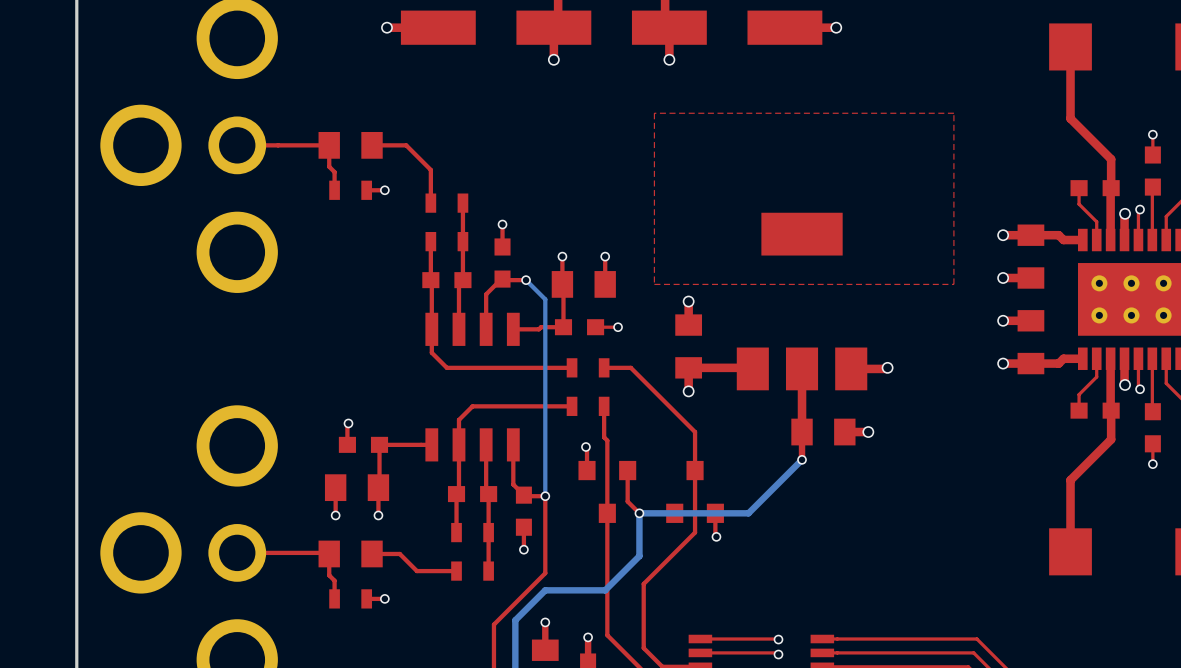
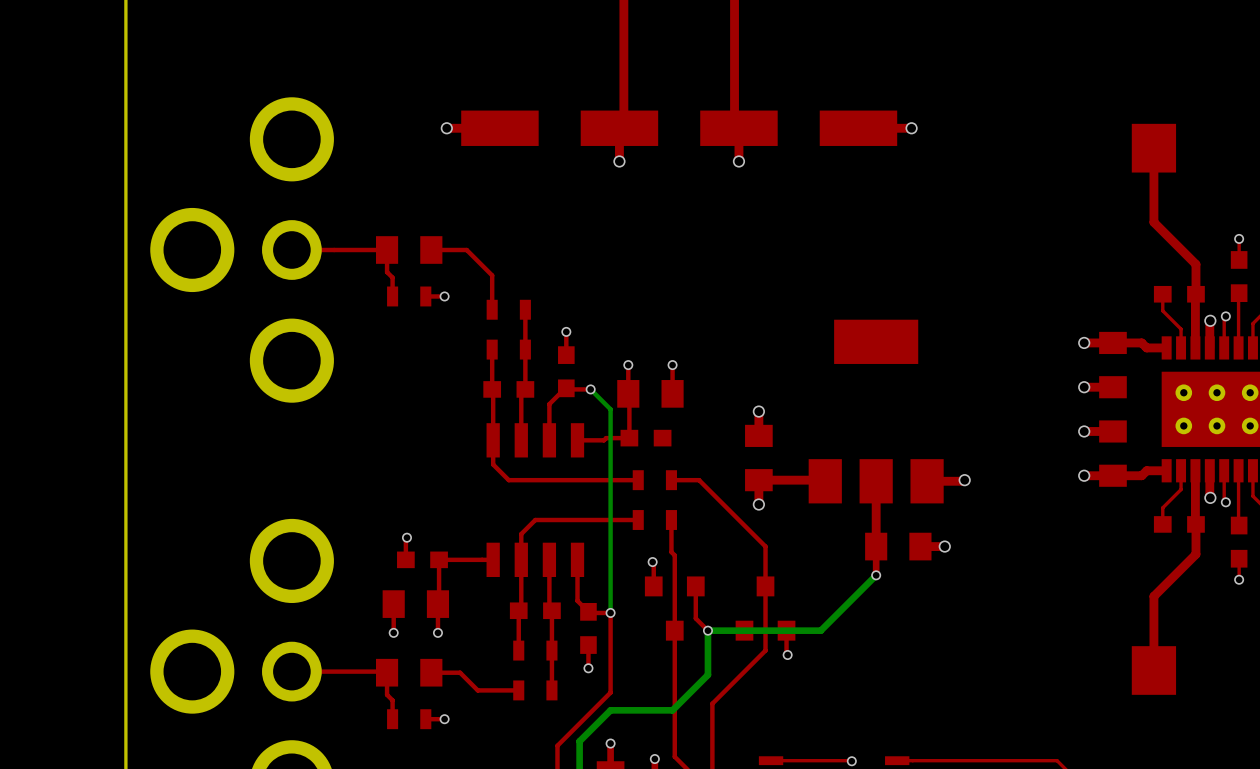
top zone outline: (953, 113) (654, 113) (654, 284) (953, 284) (953, 113) -> none
top track: (618, 327) (595, 327) -> none
via: (618, 327) -> none

